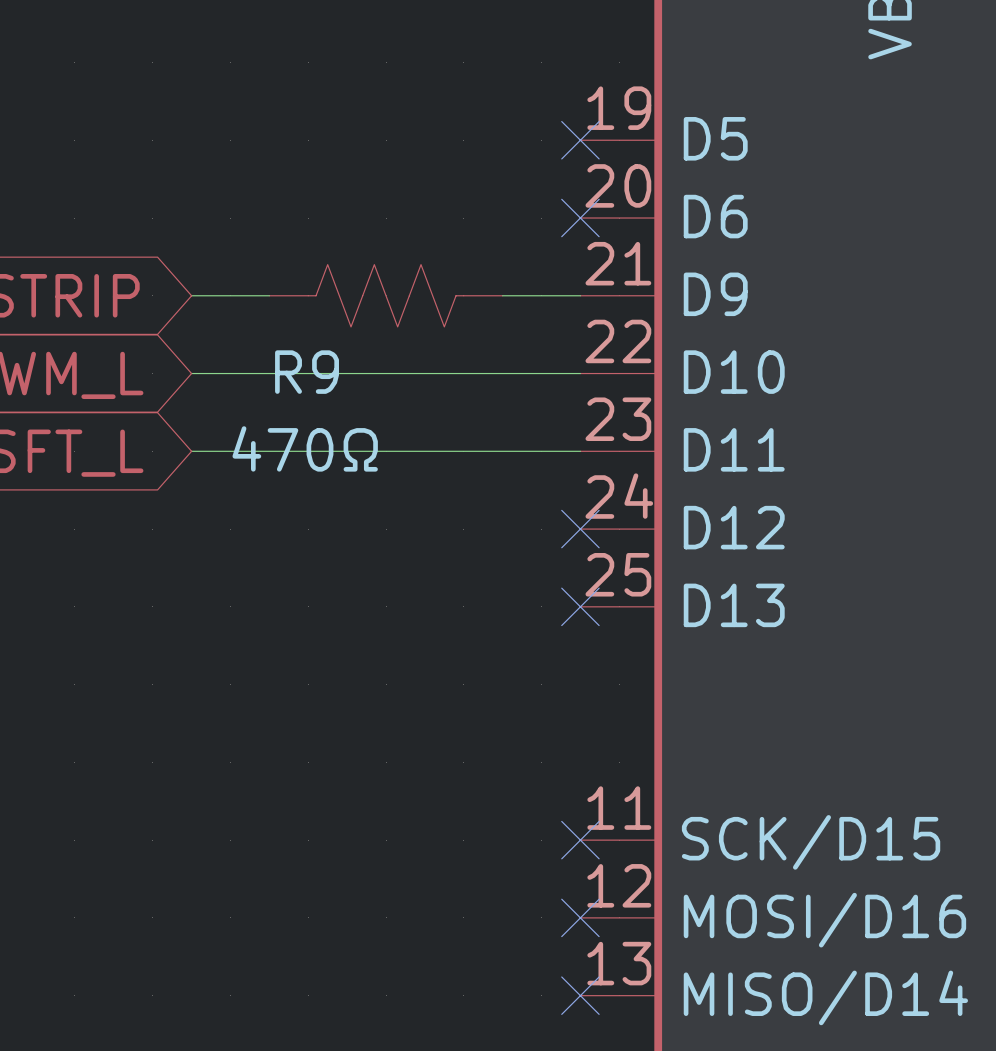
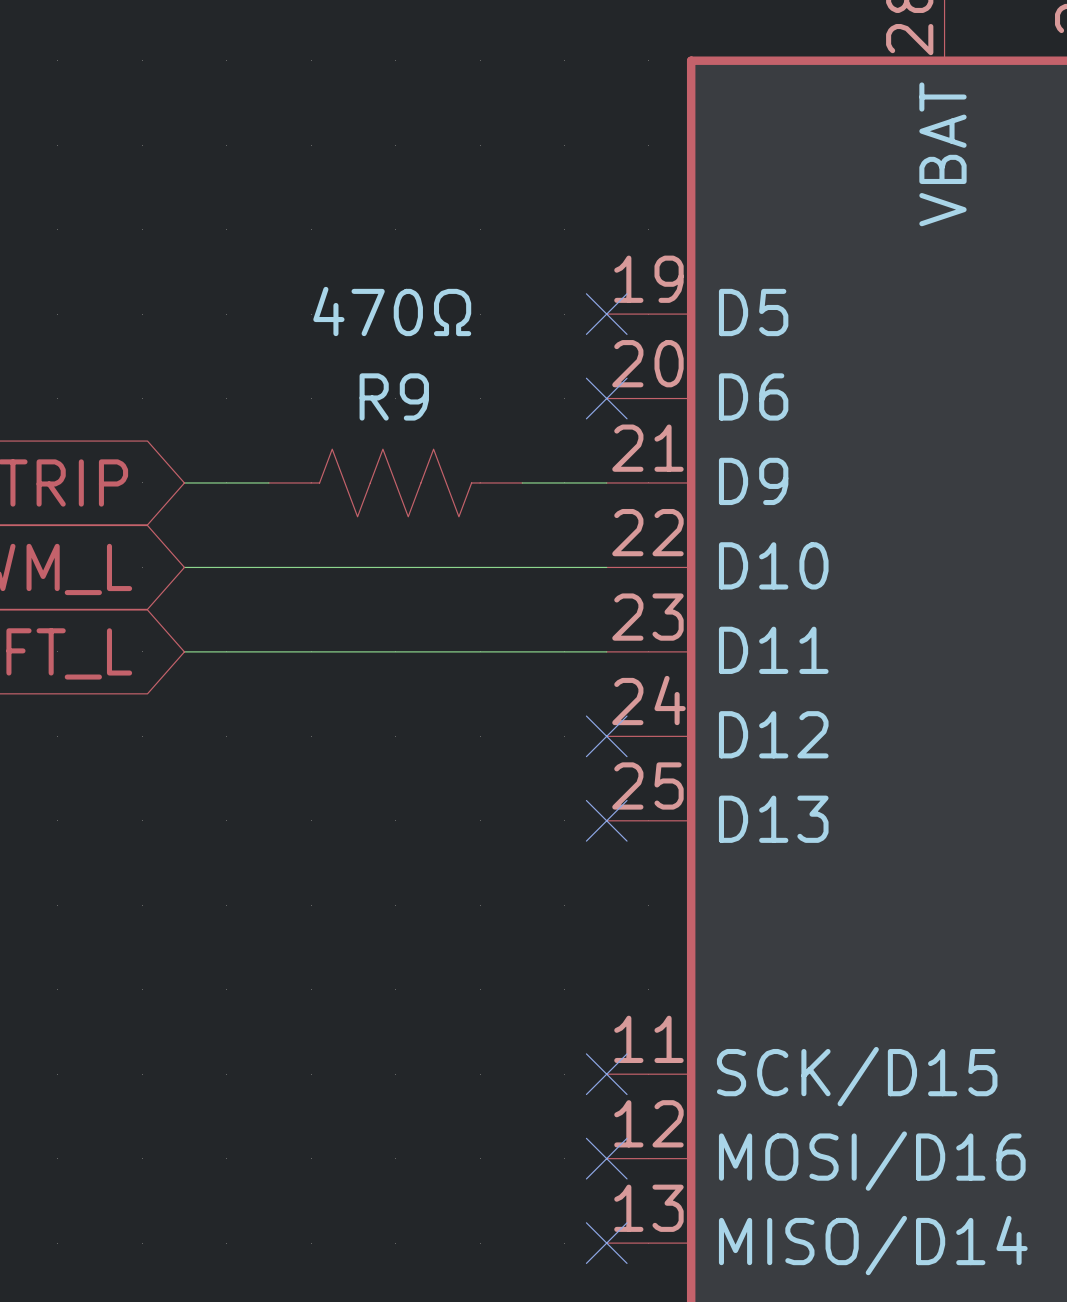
R9 name position: R9 (307, 372) -> R9 (394, 396)
R9 value position: 470Ω (305, 448) -> 470Ω (392, 311)

